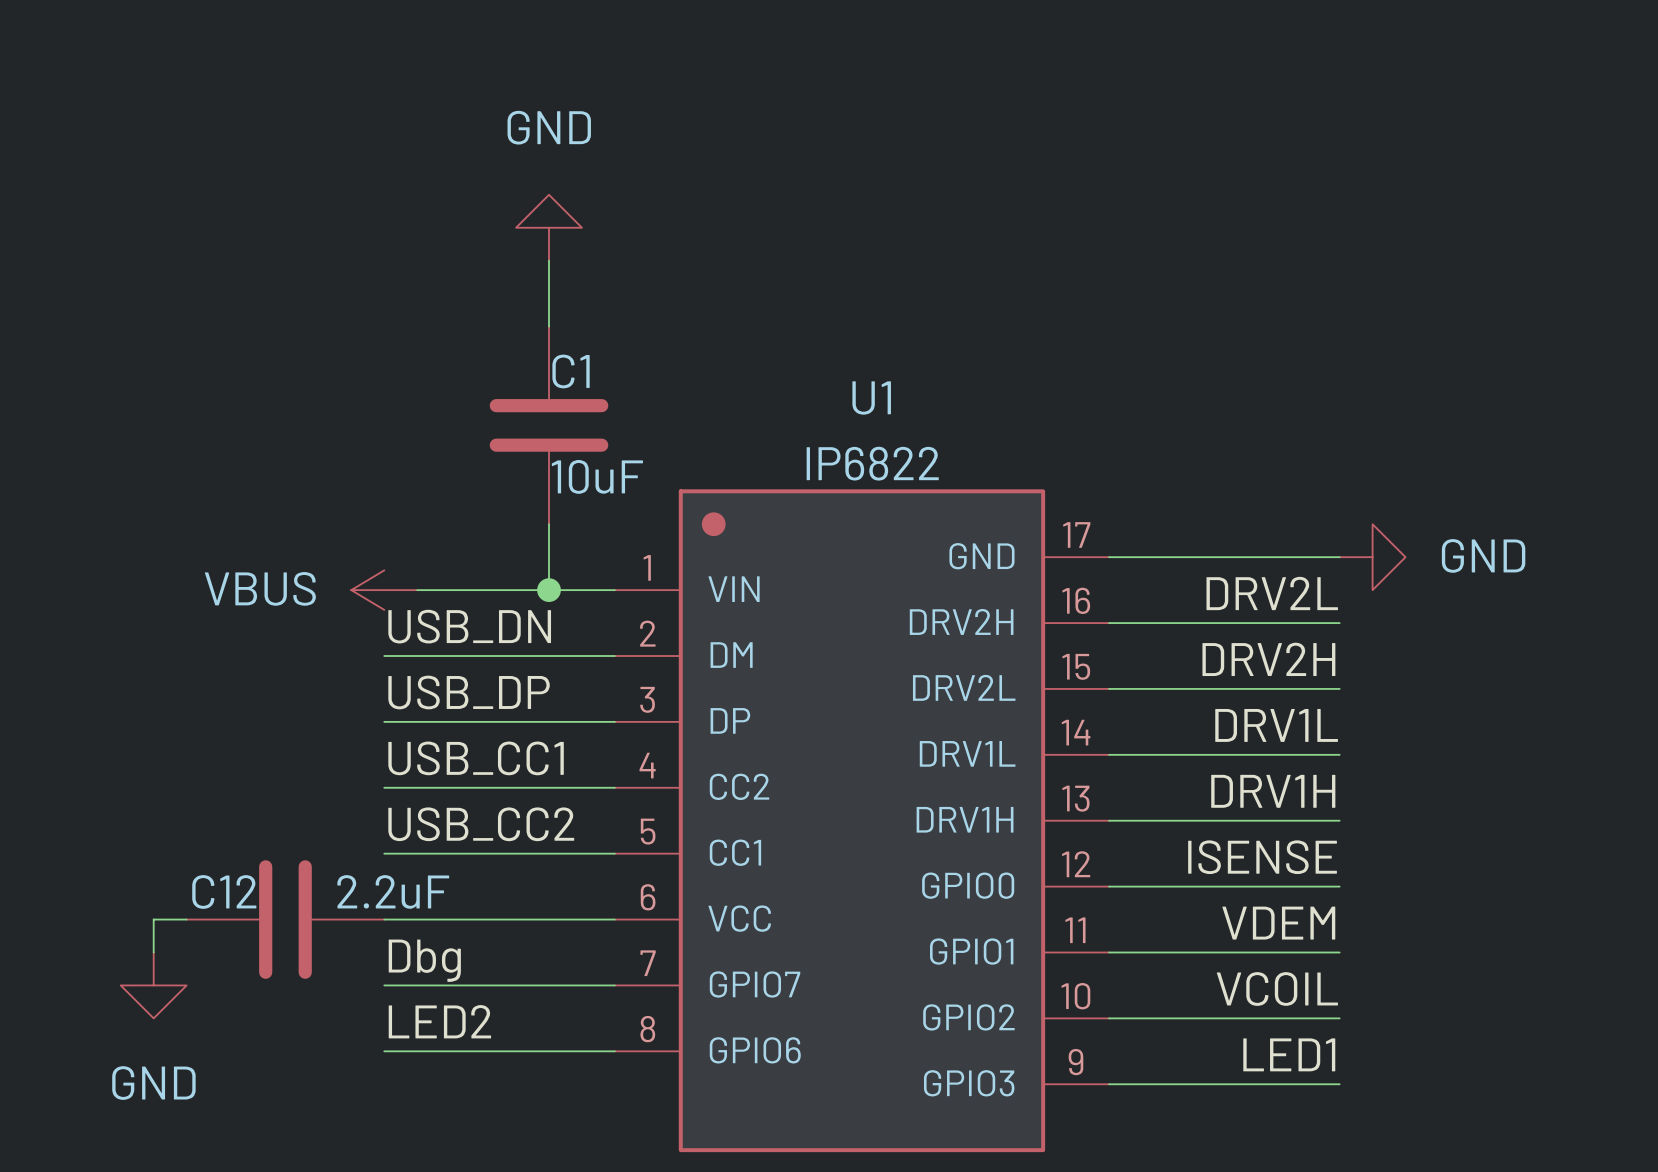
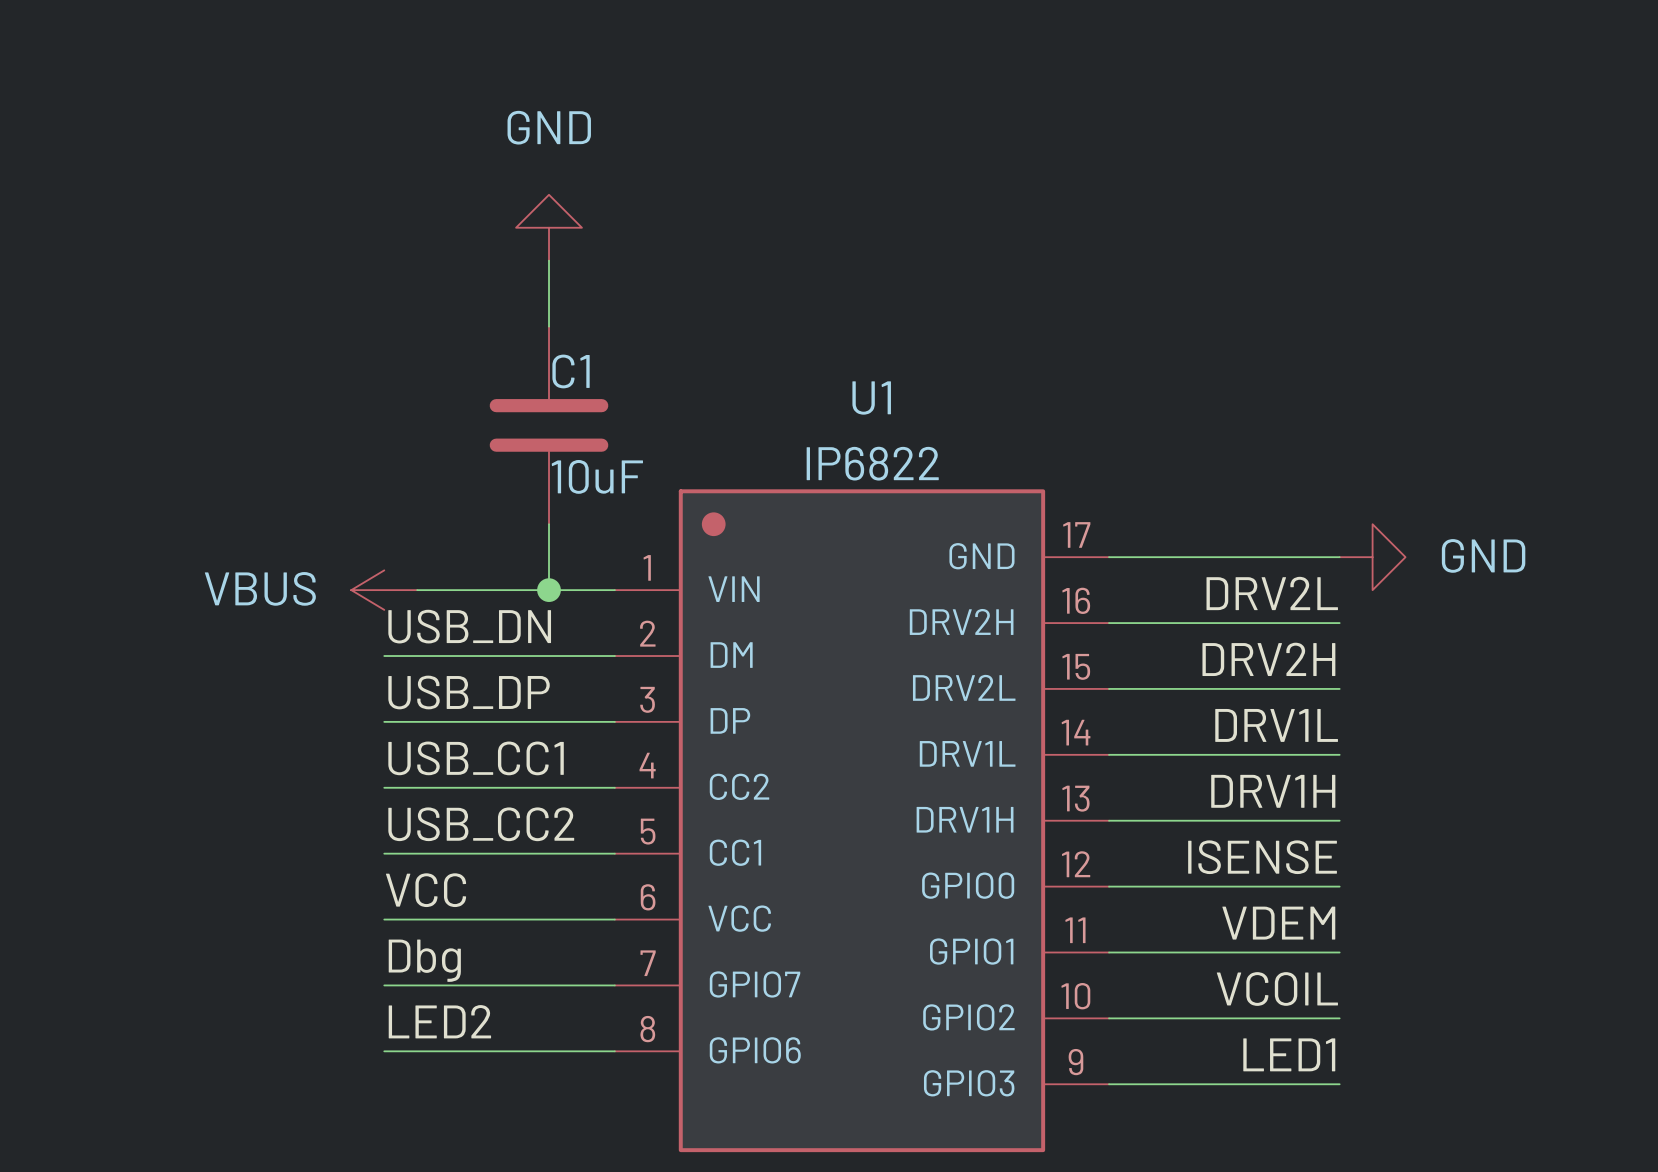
label: none -> VCC (426, 890)
wire: (186, 919) (153, 919) (153, 952) -> none
C12: 2.2uF (285, 919) -> none
power symbol: GND (153, 985) -> none

